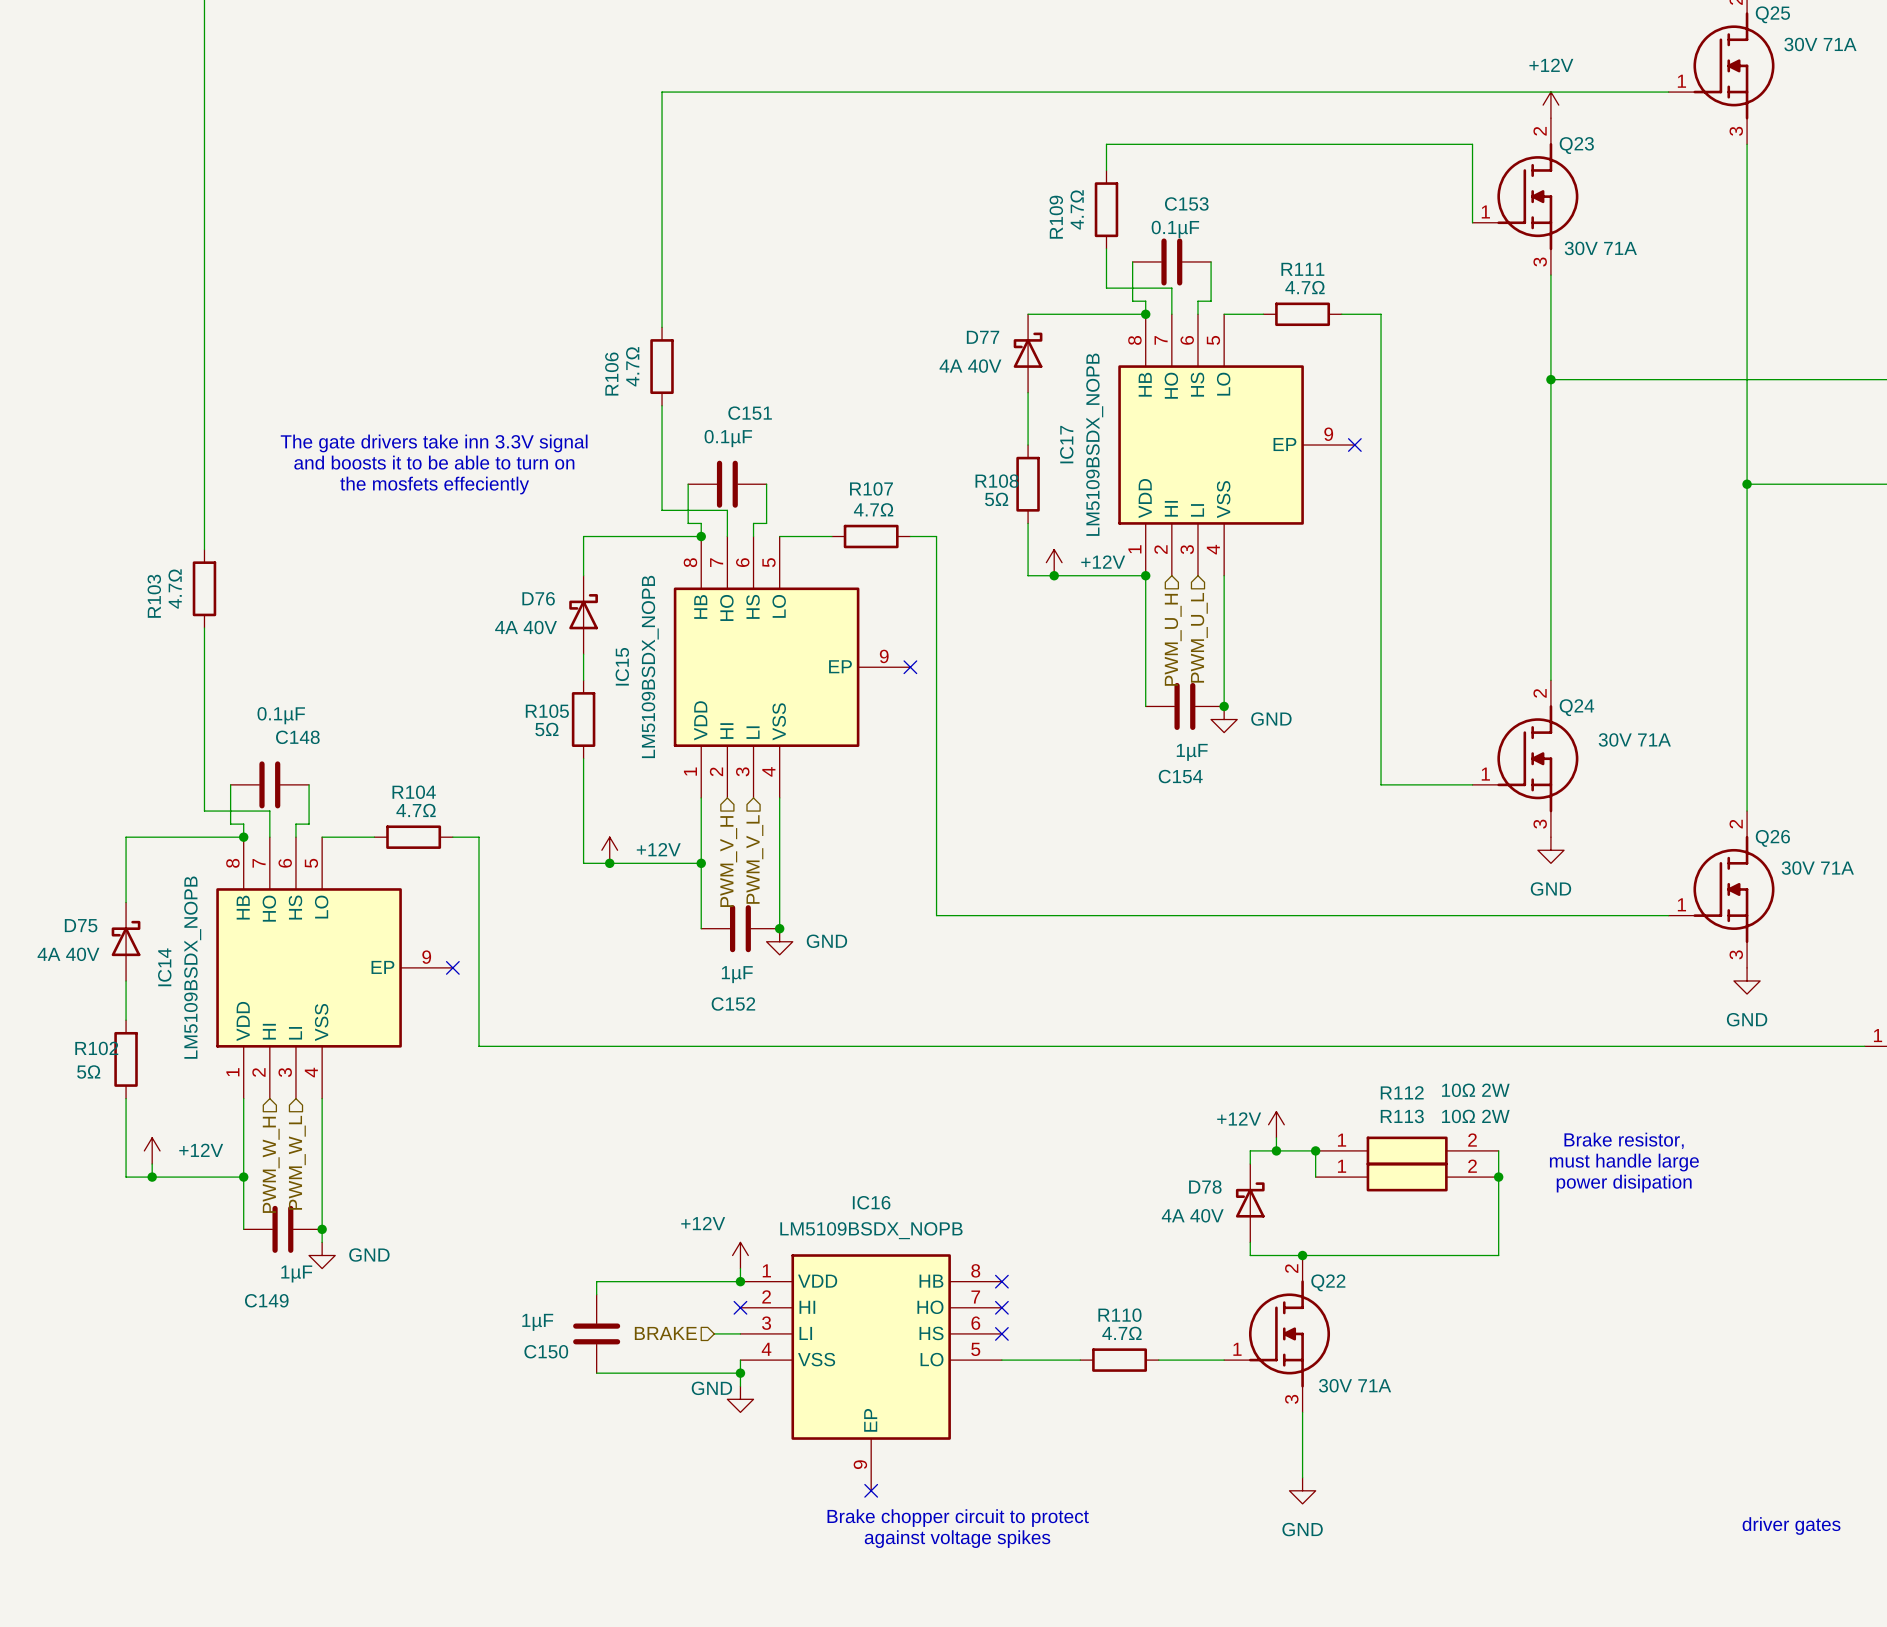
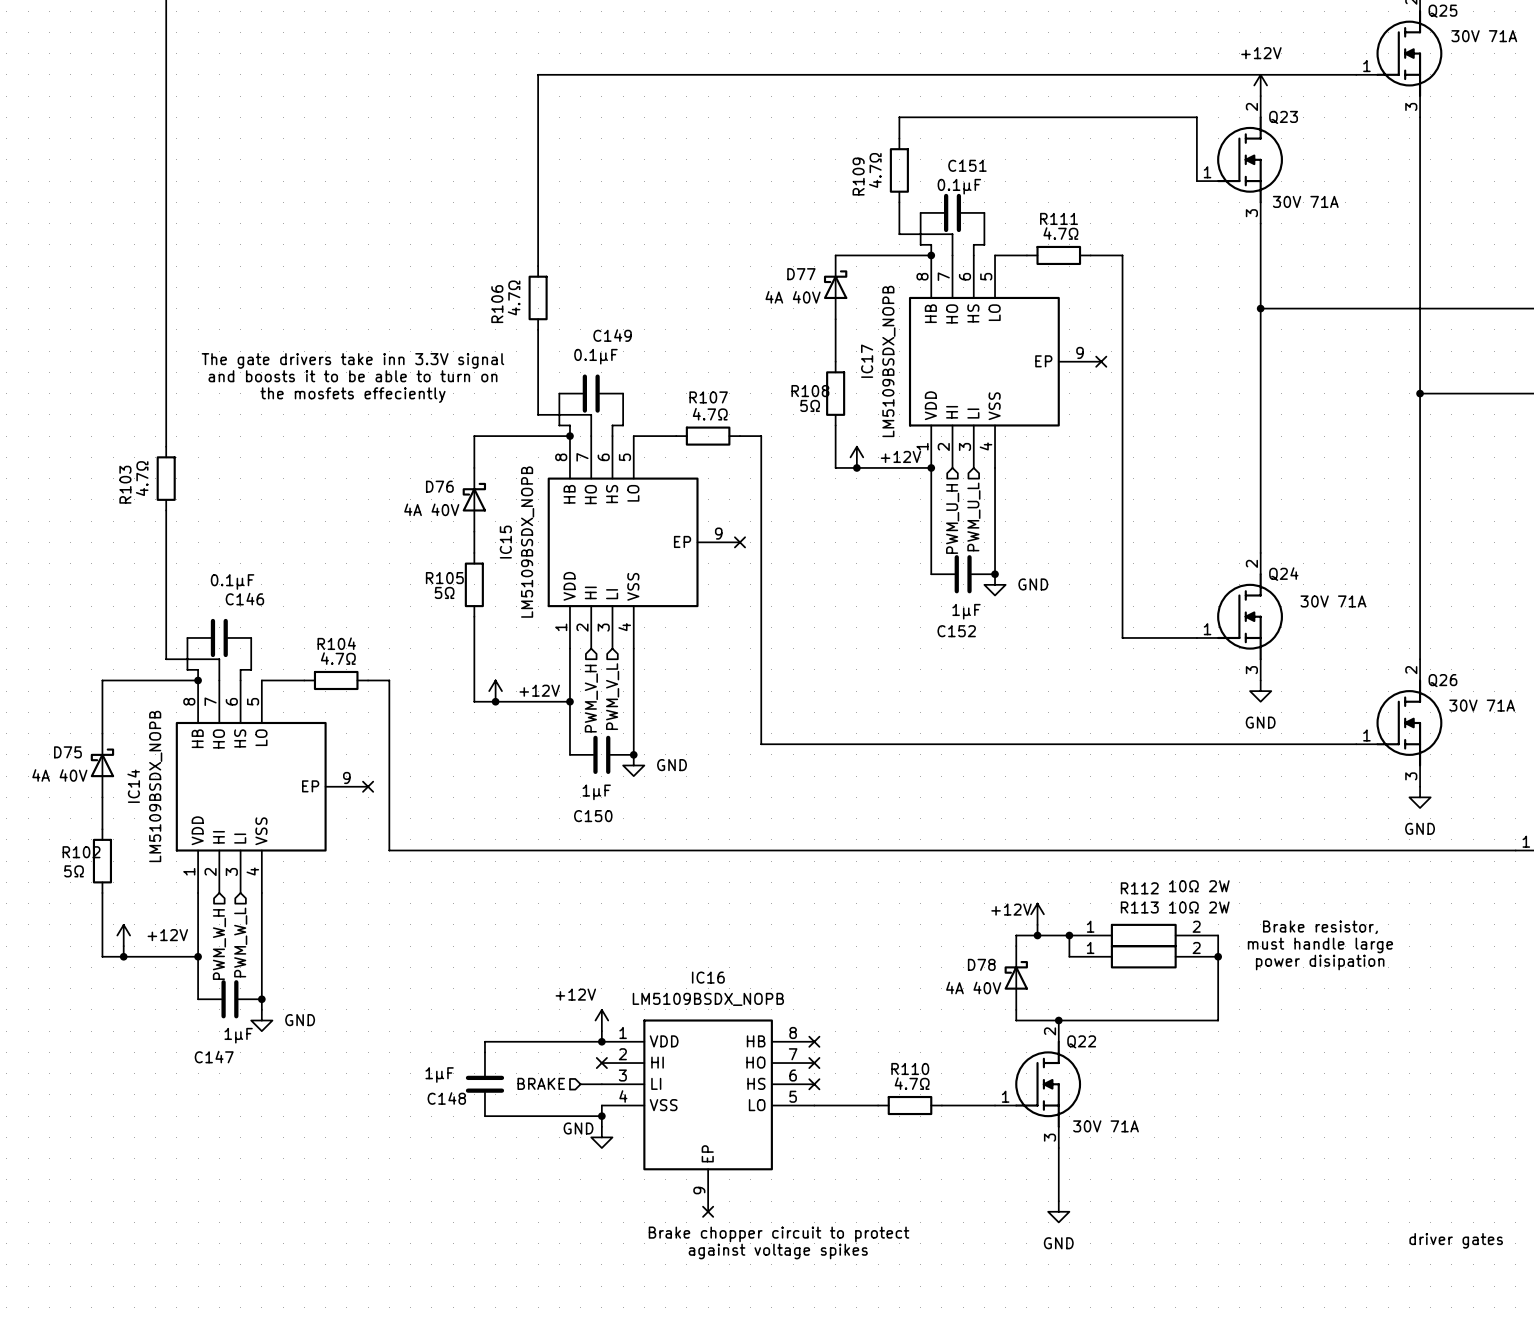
C153 name: C153 (1186, 203) -> C151 (967, 165)
C151 name: C151 (750, 413) -> C149 (612, 335)
C148 name: C148 (297, 737) -> C146 (244, 599)
C154 name: C154 (1180, 776) -> C152 (956, 631)
C152 name: C152 (733, 1004) -> C150 (593, 816)
C149 name: C149 (266, 1300) -> C147 (214, 1057)
C150 name: C150 (546, 1351) -> C148 (446, 1098)

